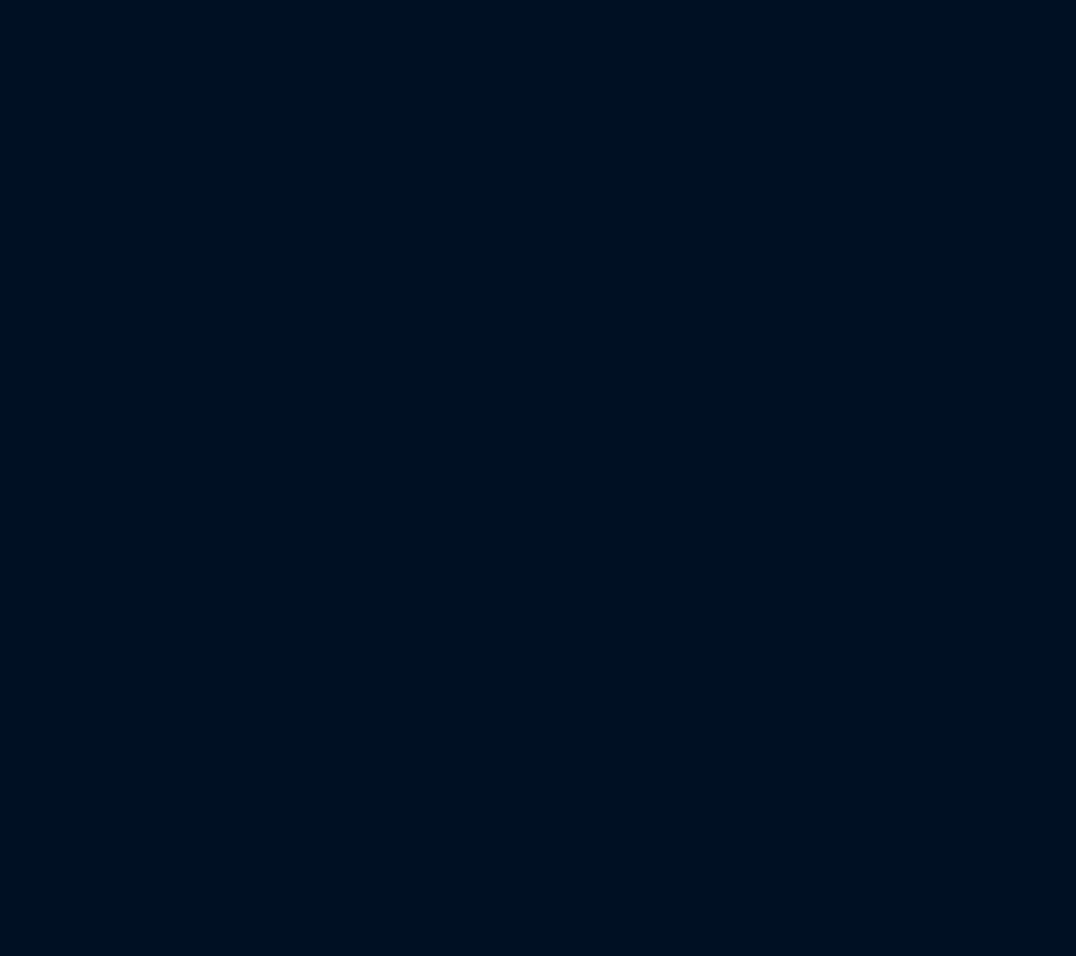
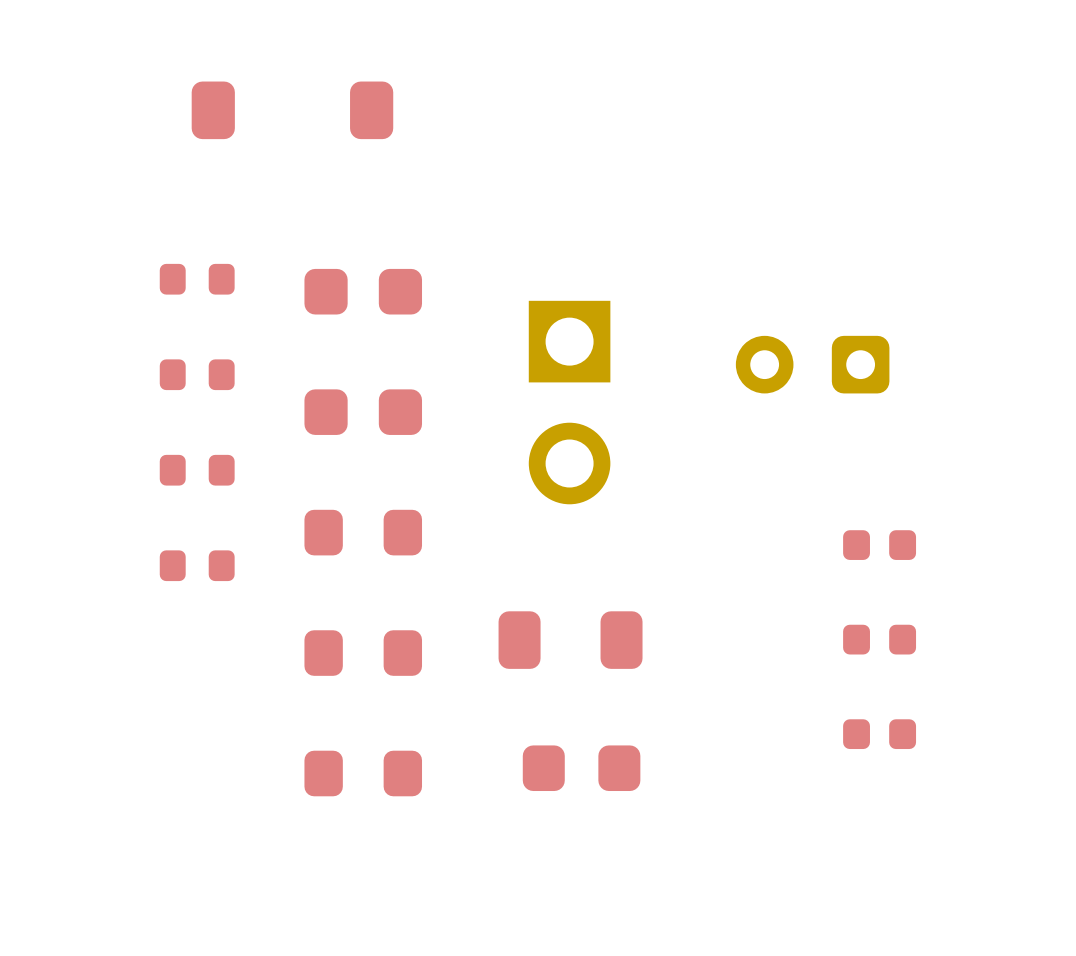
part: none -> (292, 110)
part: none -> (197, 279)
part: none -> (363, 291)
part: none -> (812, 364)
part: none -> (197, 374)
part: none -> (569, 402)
part: none -> (363, 412)
part: none -> (197, 470)
part: none -> (363, 532)
part: none -> (879, 545)
part: none -> (197, 565)
part: none -> (879, 639)
part: none -> (570, 640)
part: none -> (363, 653)
part: none -> (879, 734)
part: none -> (581, 768)
part: none -> (363, 773)

